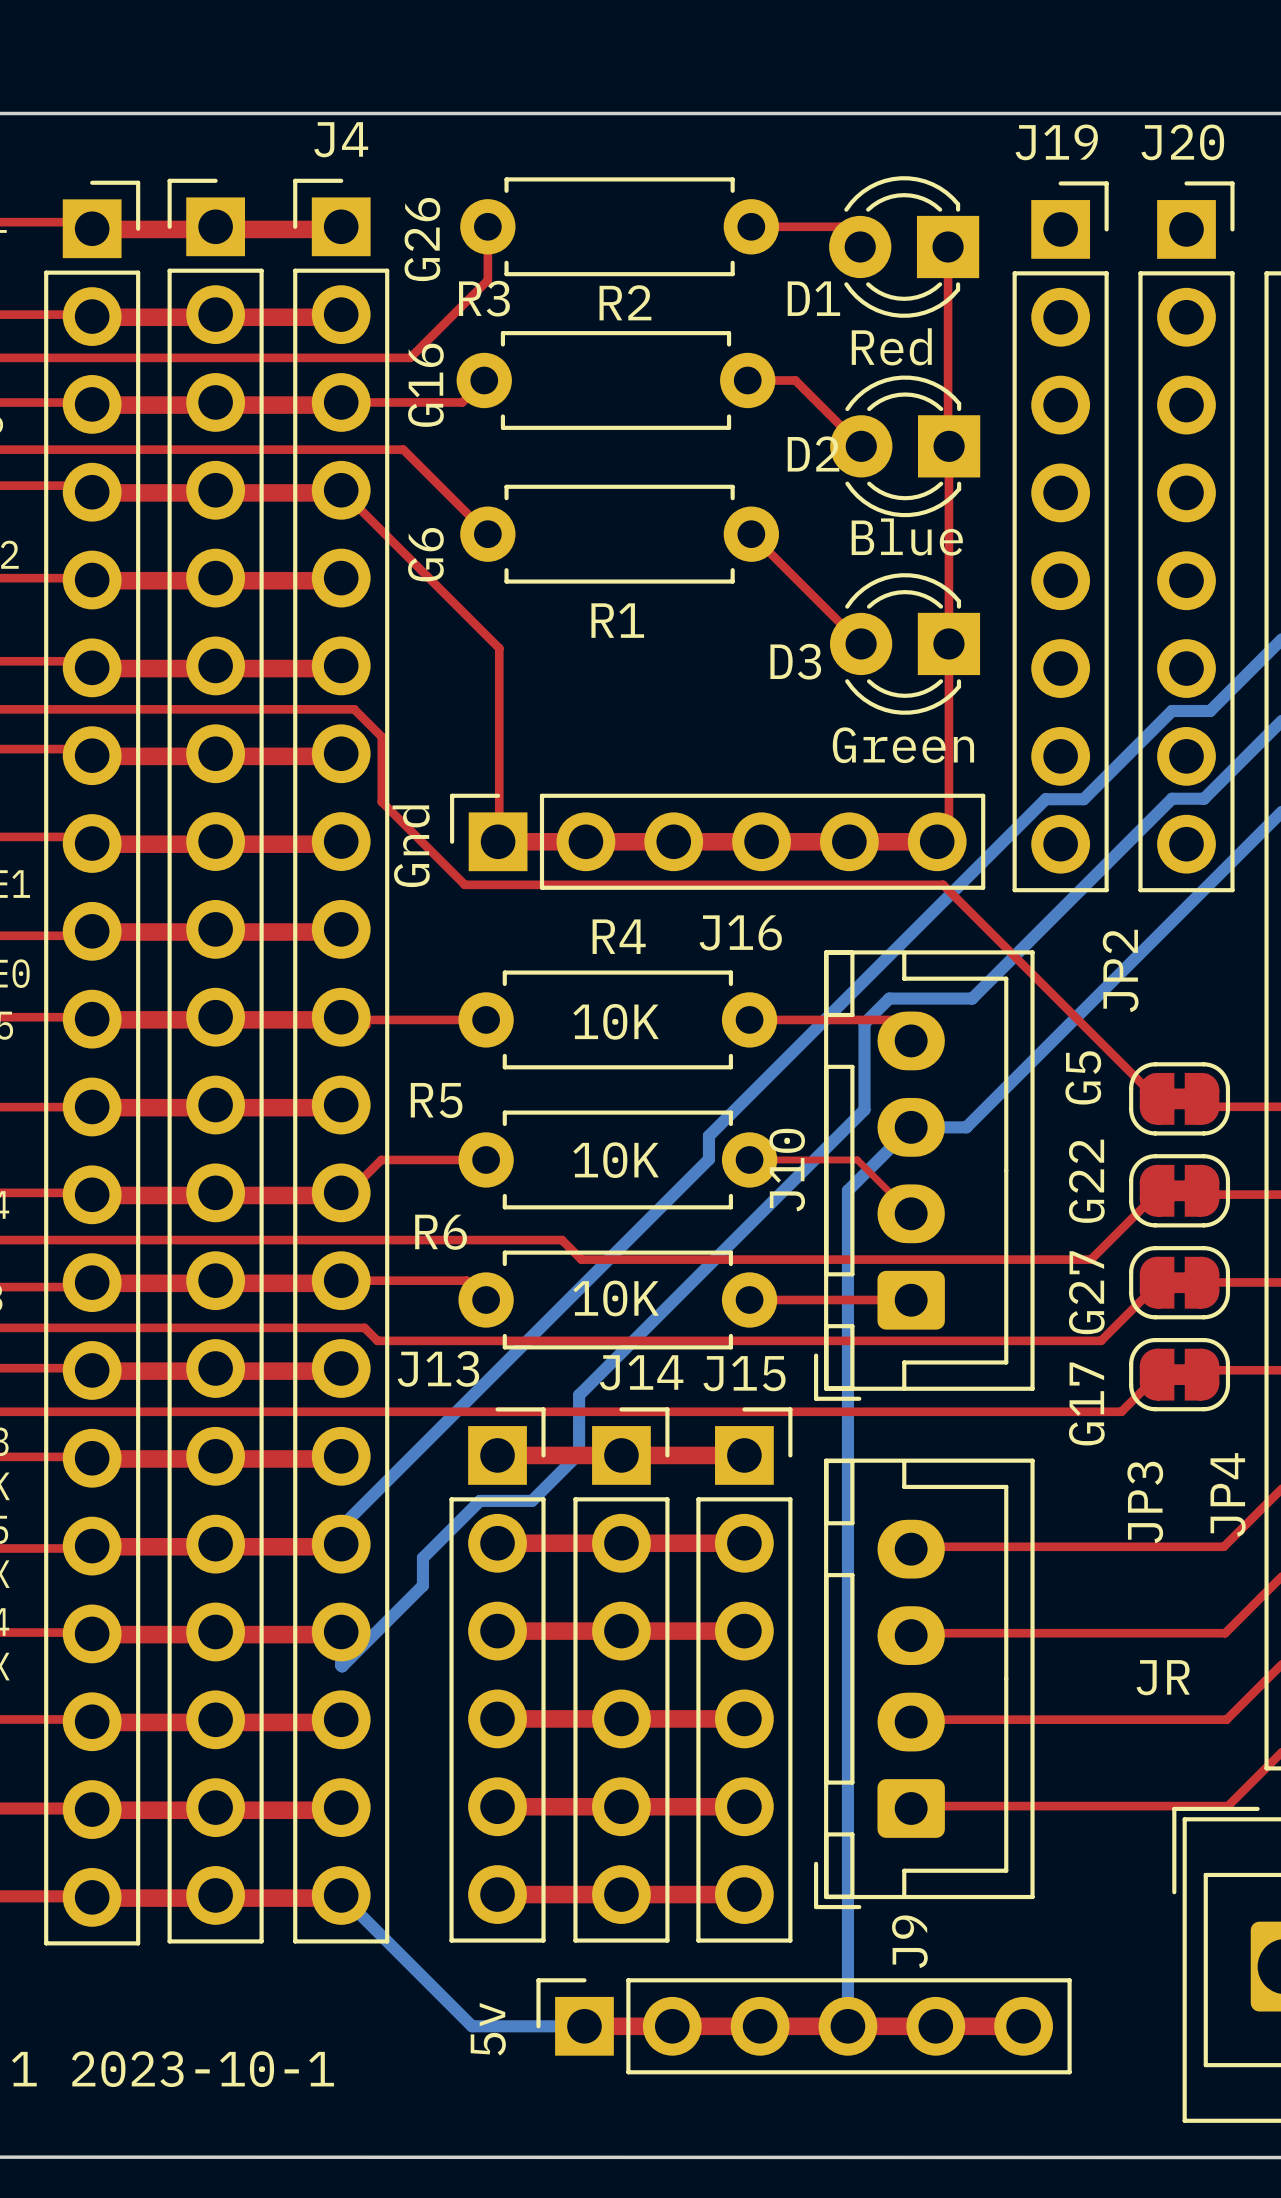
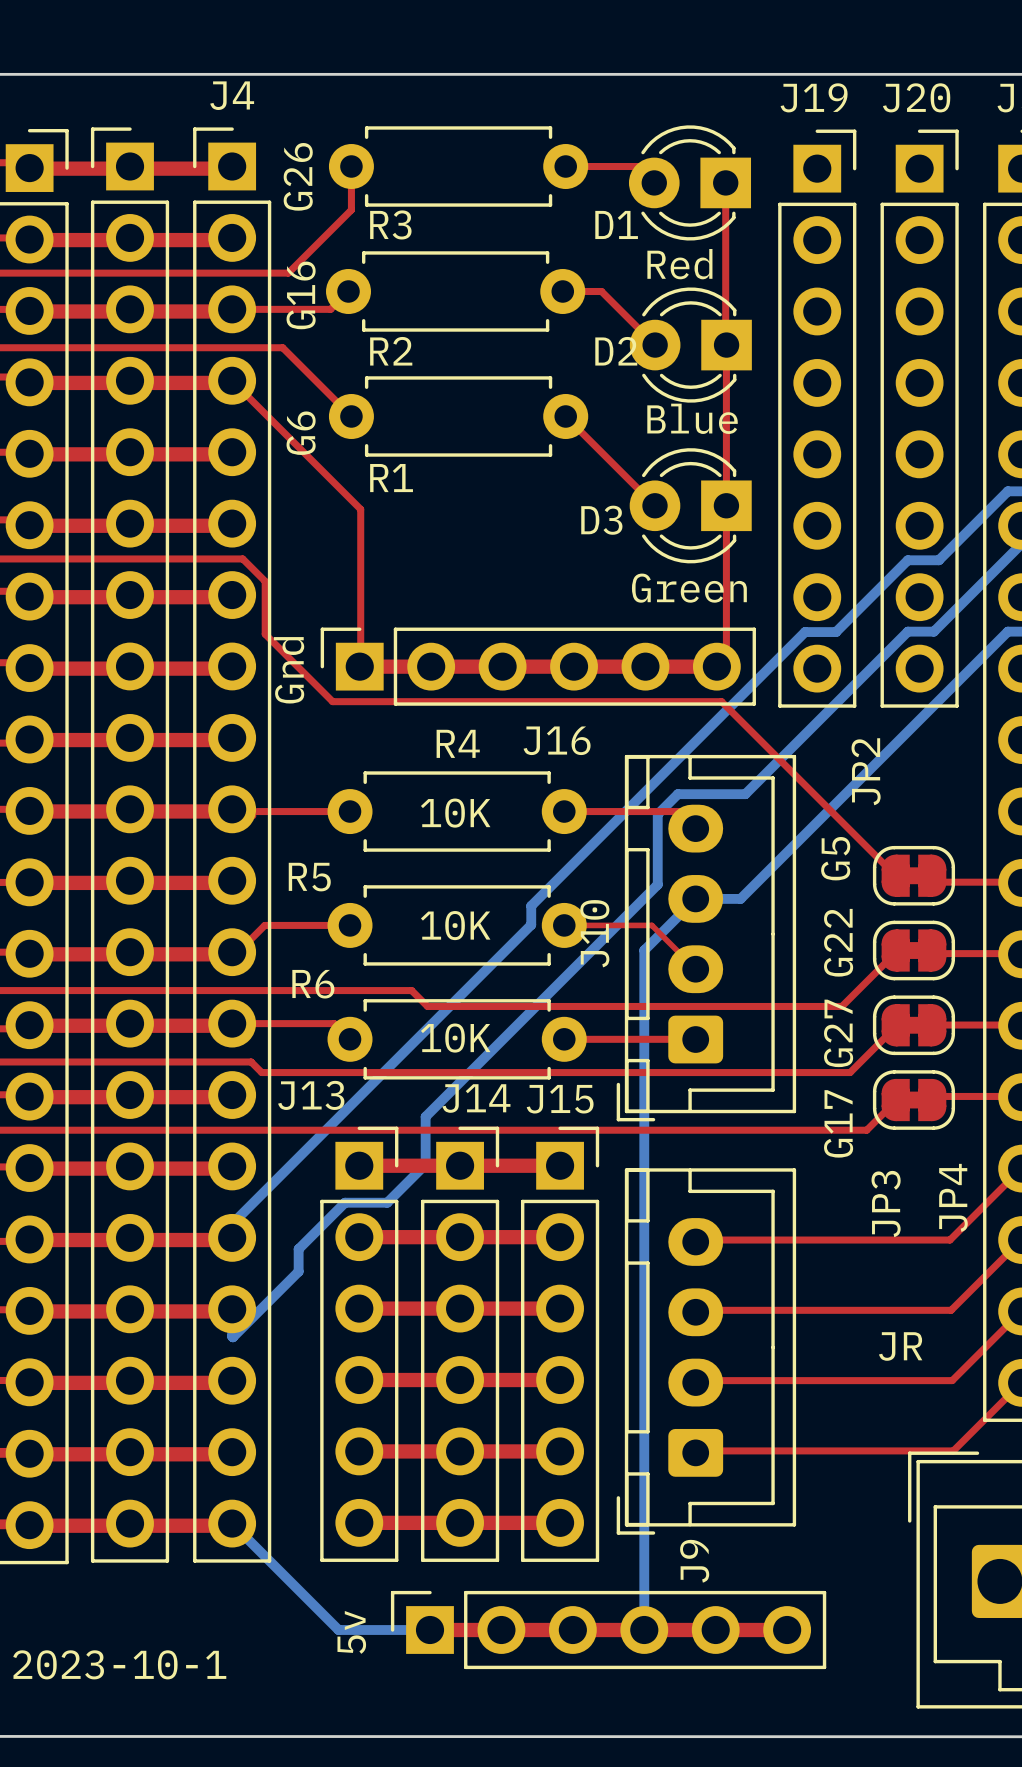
R3 name position: R3 (484, 298) -> R3 (390, 224)
R2 name position: R2 (625, 302) -> R2 (391, 351)
R1 name position: R1 (617, 620) -> R1 (391, 478)

